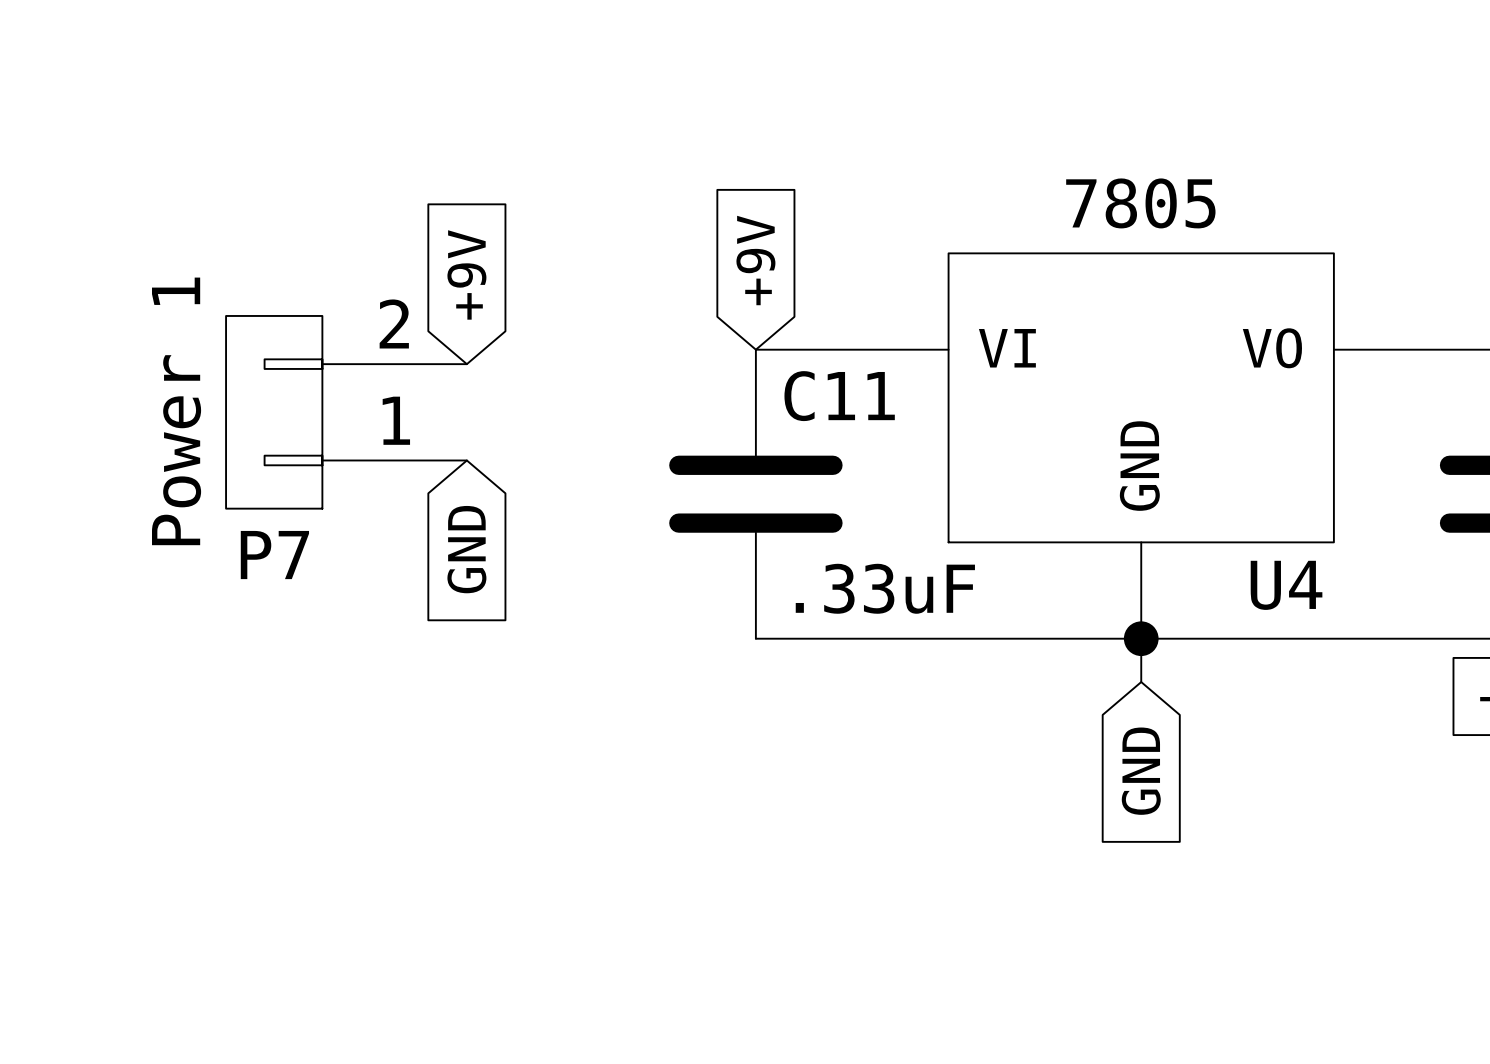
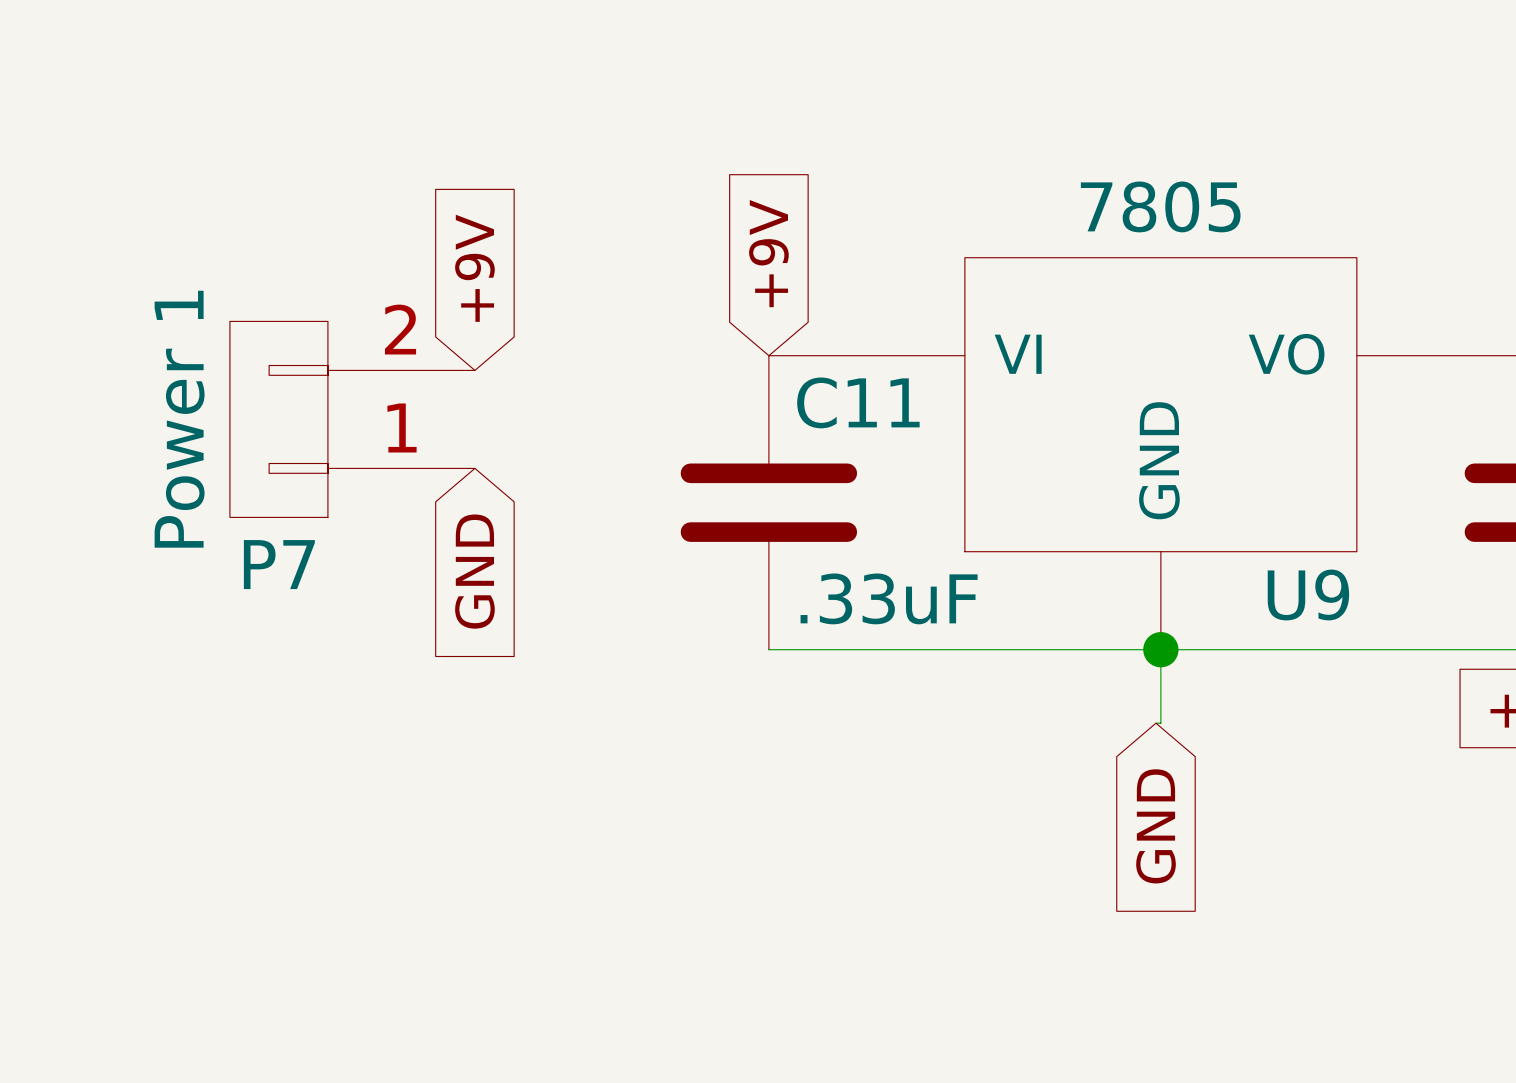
U4 name: U4 (1286, 585) -> U9 (1308, 594)
wire: none -> (1160, 693) (1160, 723) (1155, 723)
global label position: GND (1141, 771) -> GND (1156, 826)

